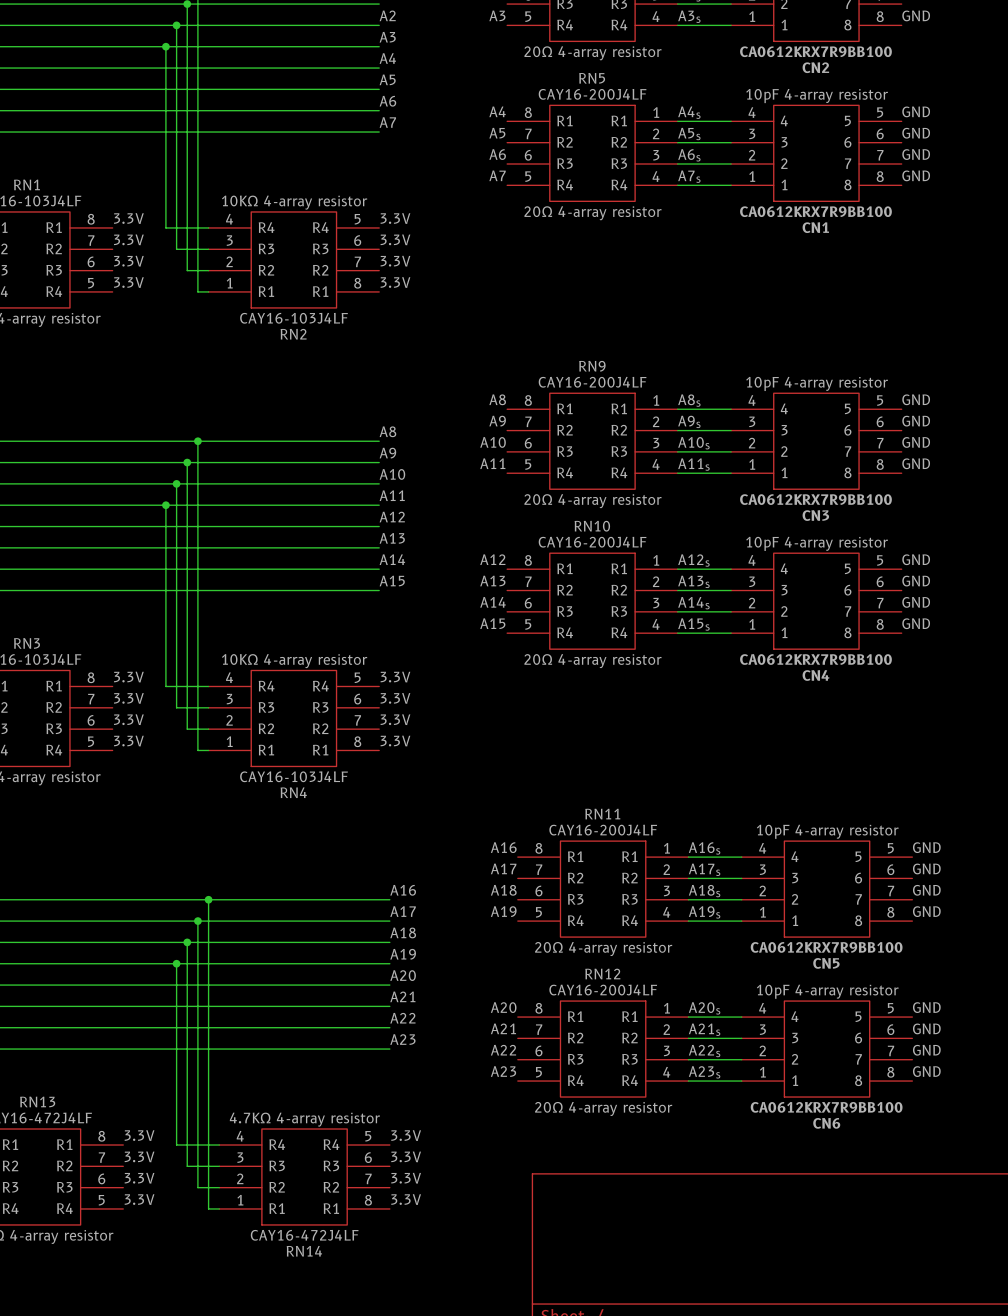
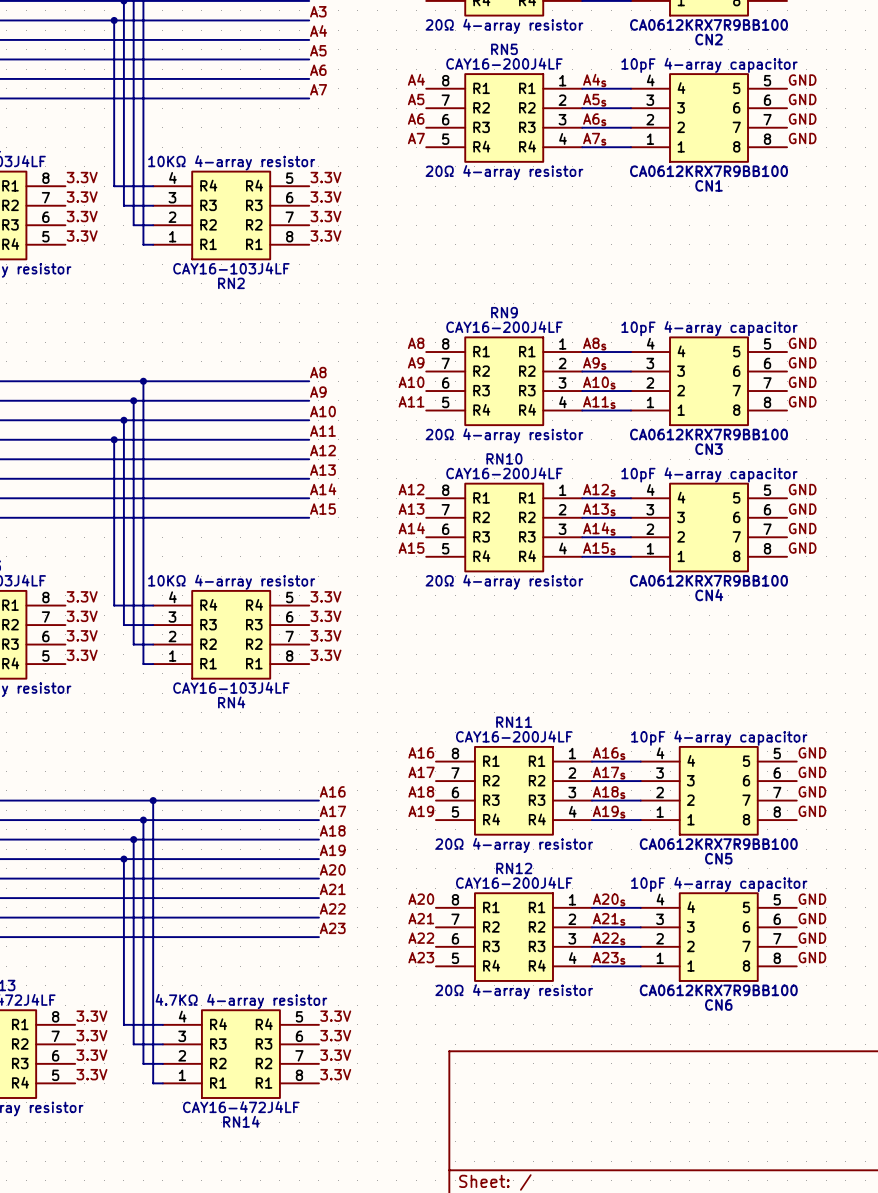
CN1 text: 10pF 4-array resistor (817, 96) -> 10pF 4-array capacitor (709, 65)
CN3 text: 10pF 4-array resistor (817, 383) -> 10pF 4-array capacitor (709, 328)
CN4 text: 10pF 4-array resistor (817, 543) -> 10pF 4-array capacitor (709, 474)
CN5 text: 10pF 4-array resistor (827, 831) -> 10pF 4-array capacitor (719, 738)
CN6 text: 10pF 4-array resistor (827, 991) -> 10pF 4-array capacitor (719, 884)

